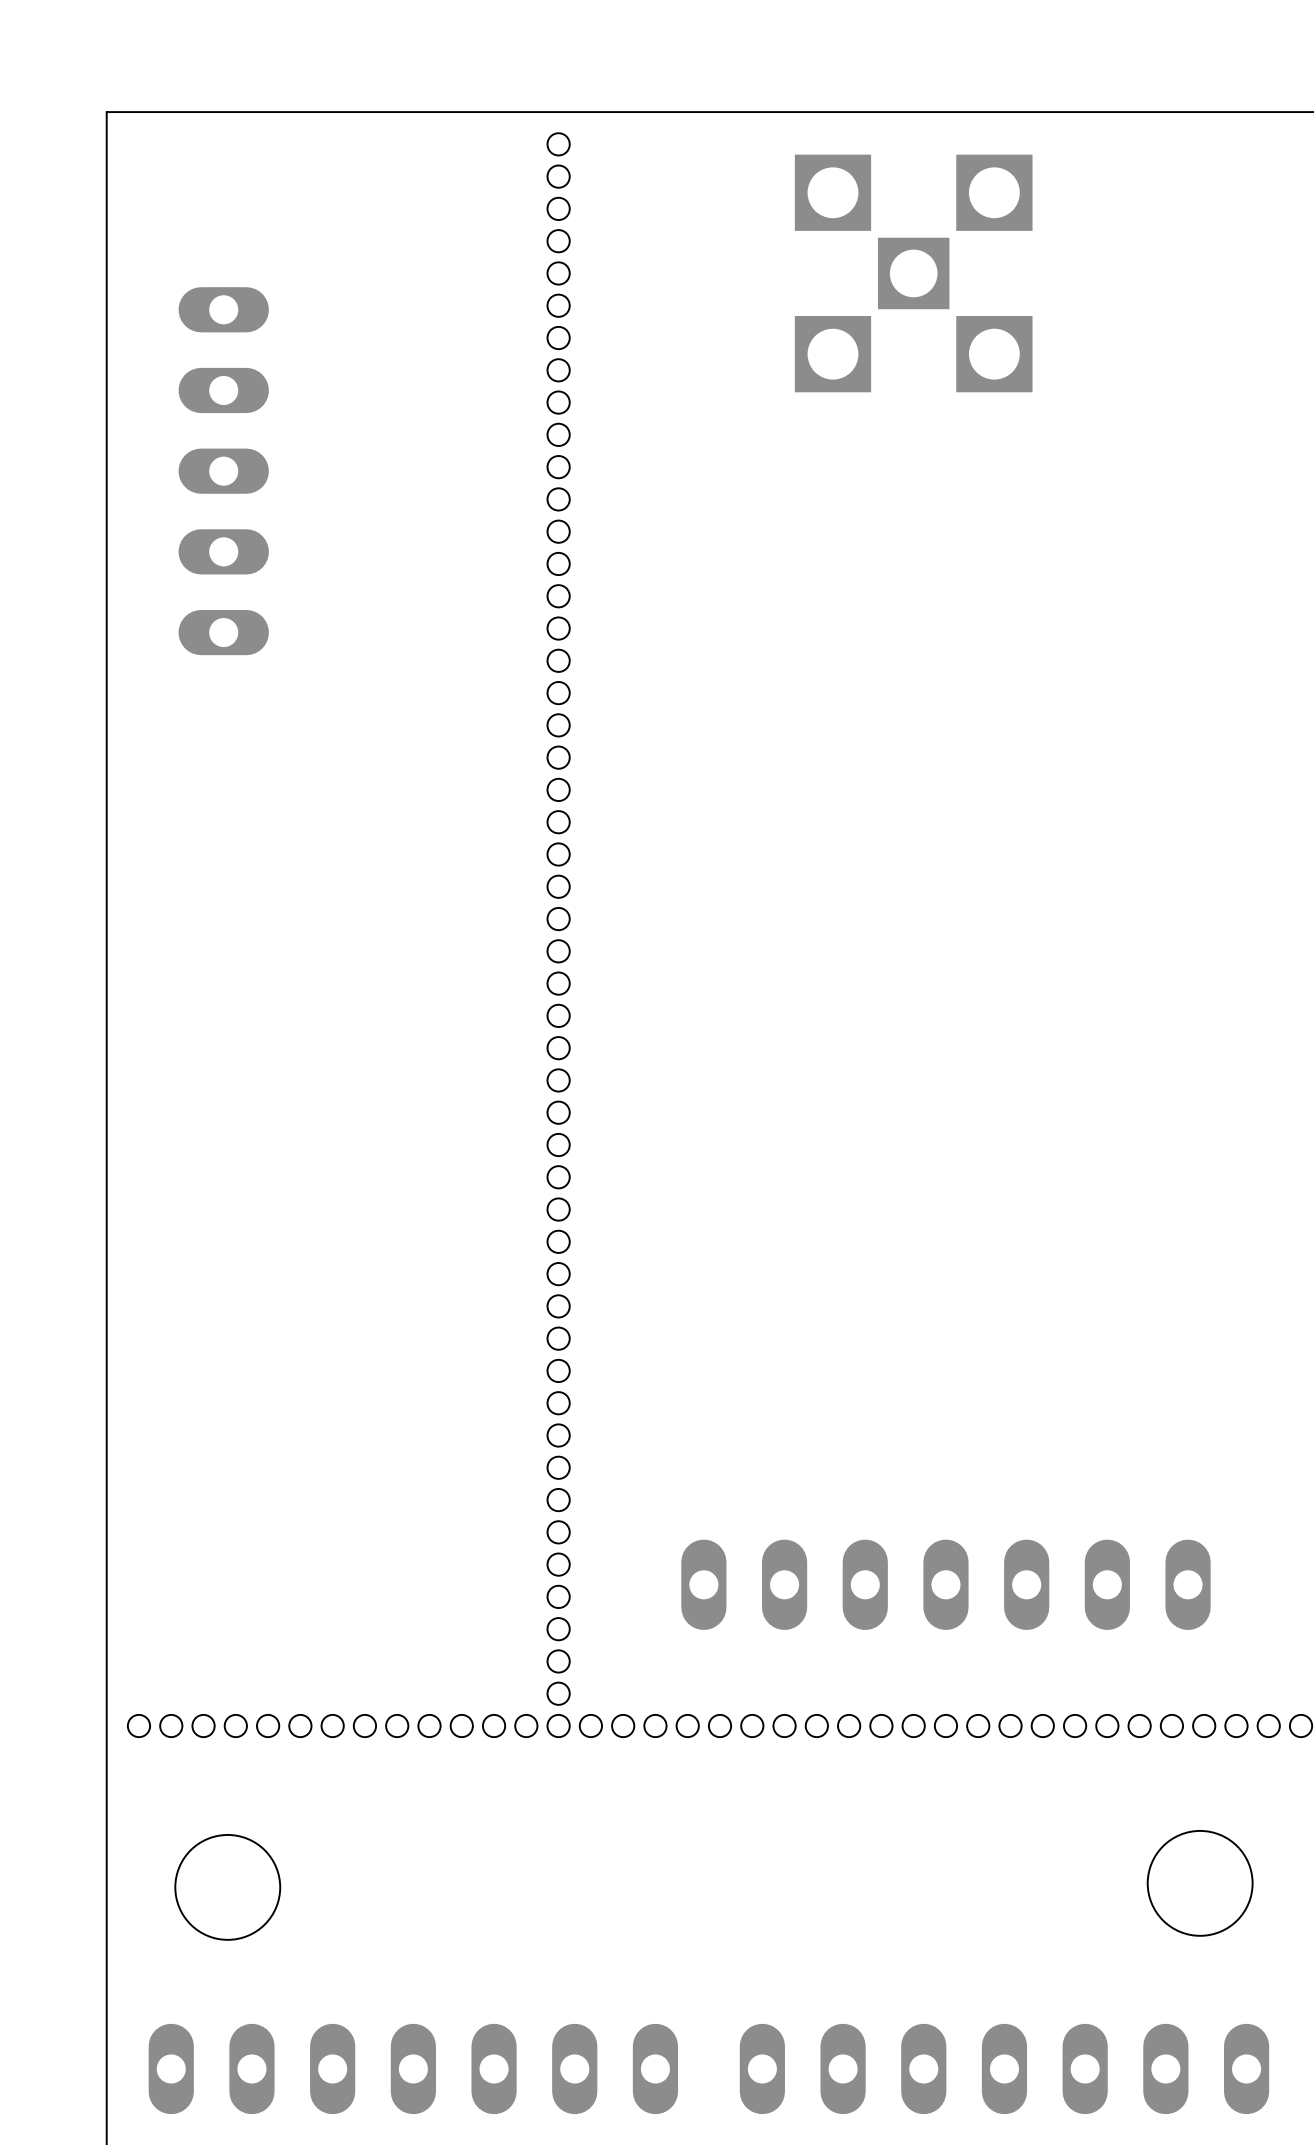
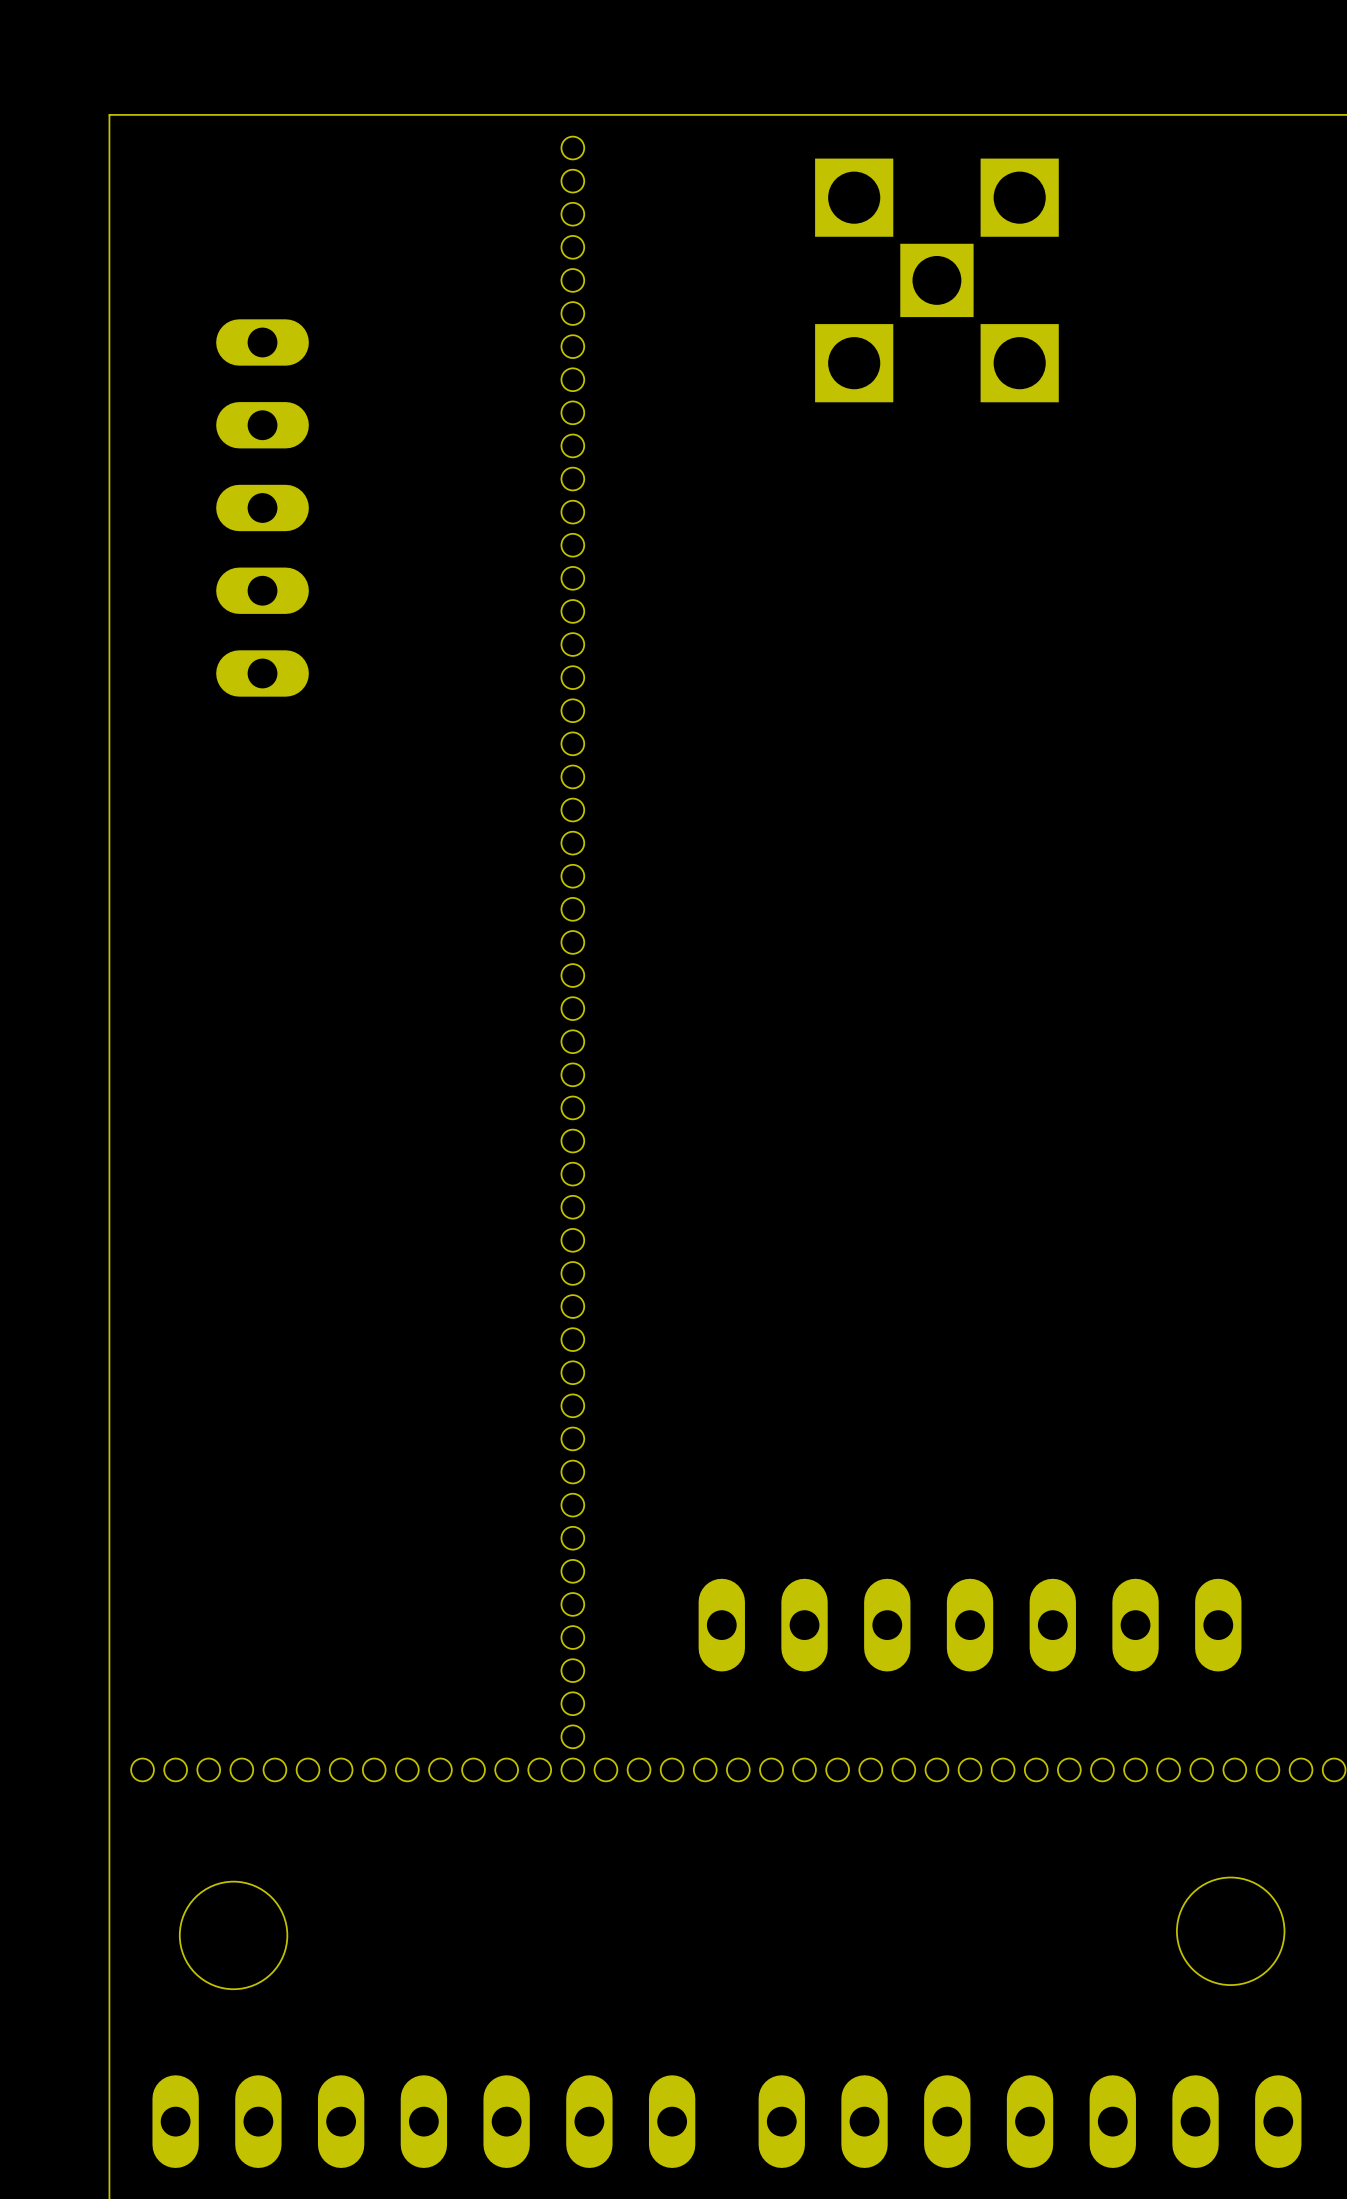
part position: (223, 471) -> (262, 507)

